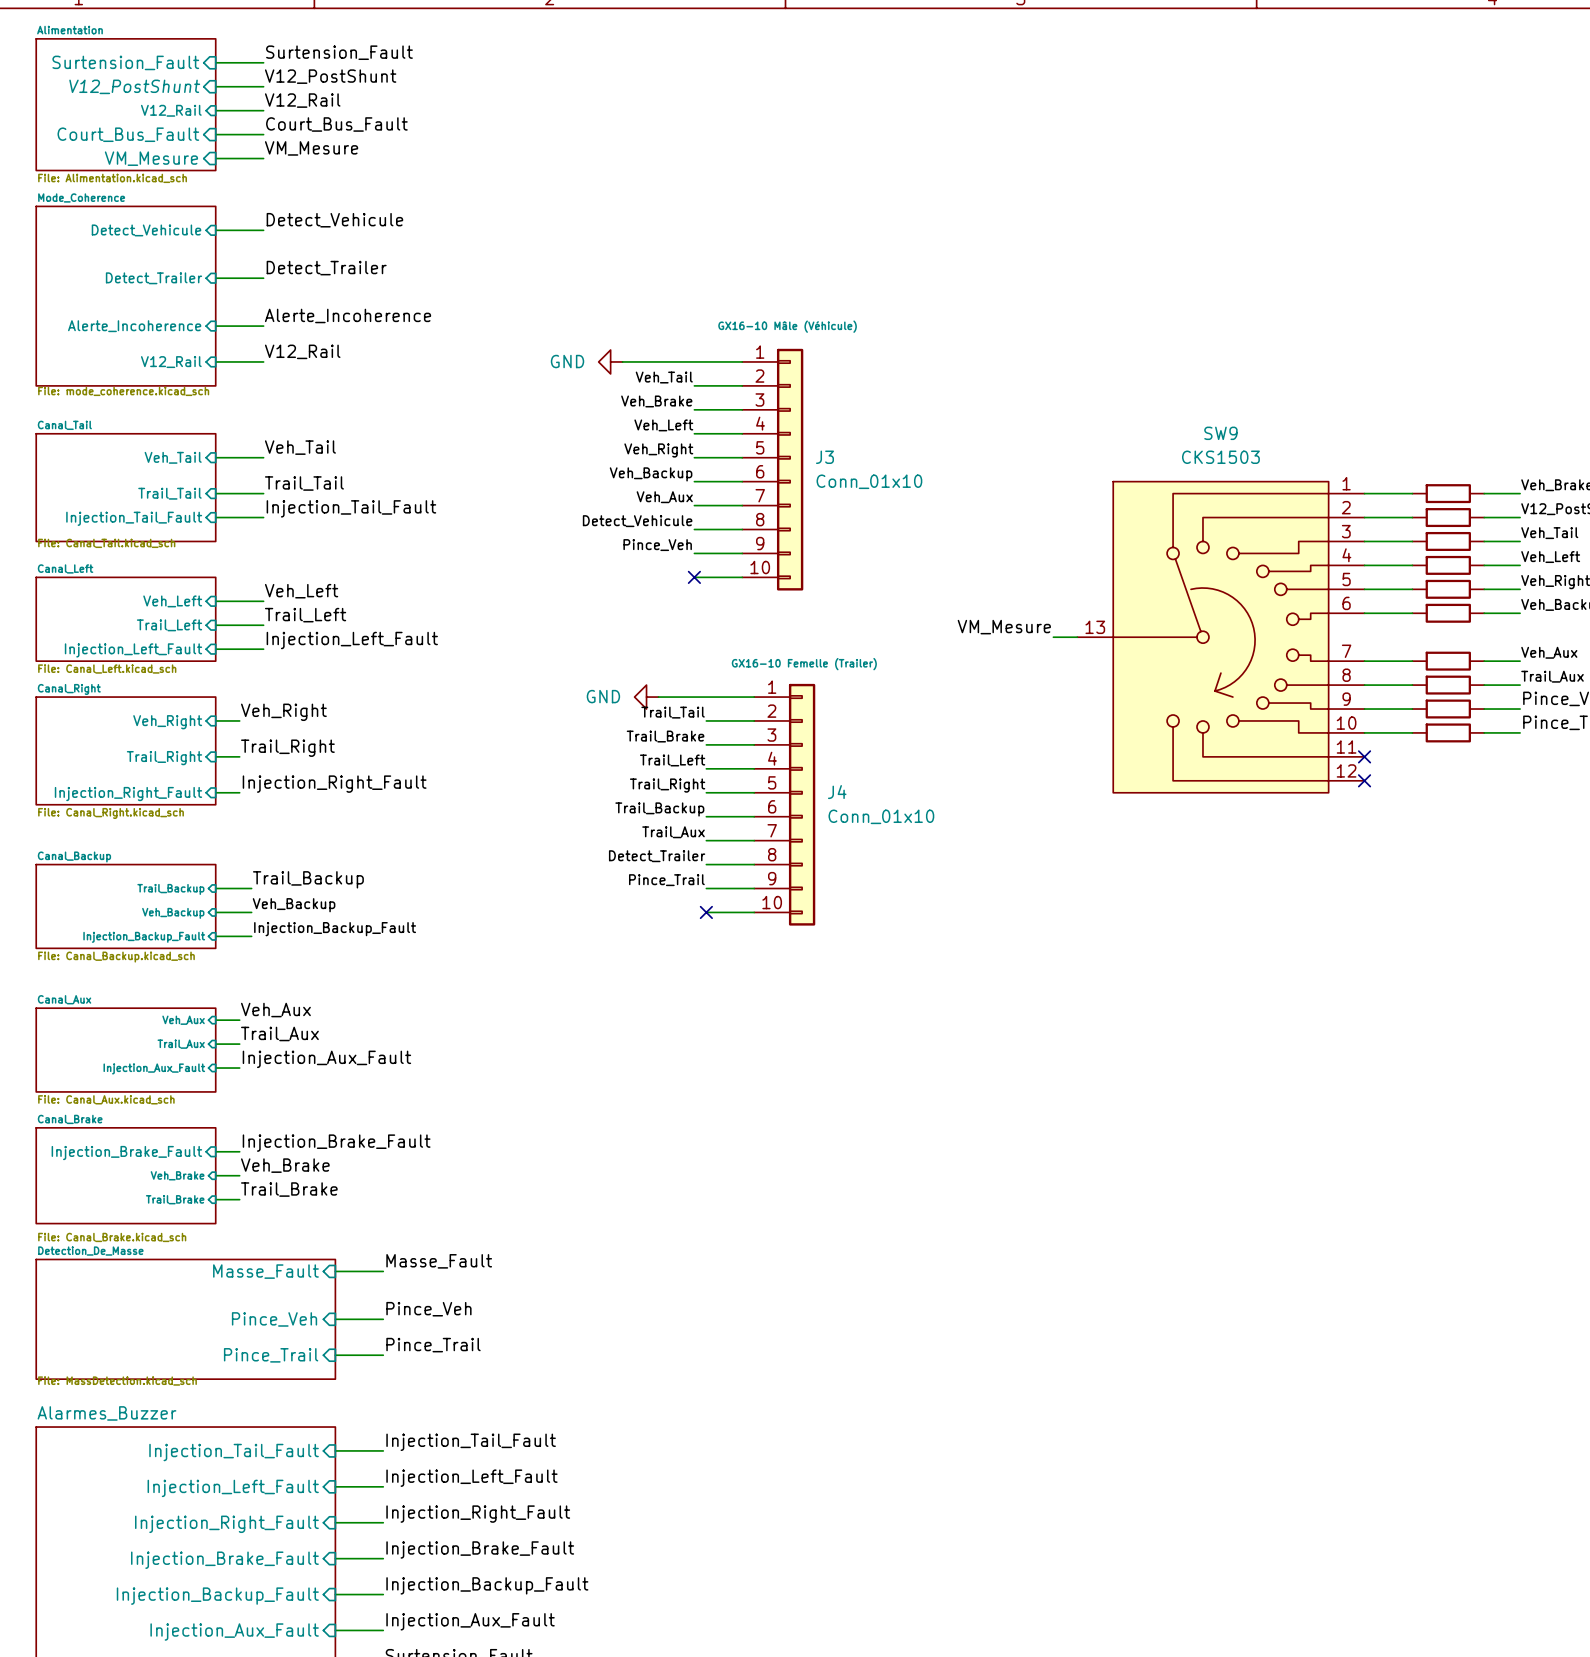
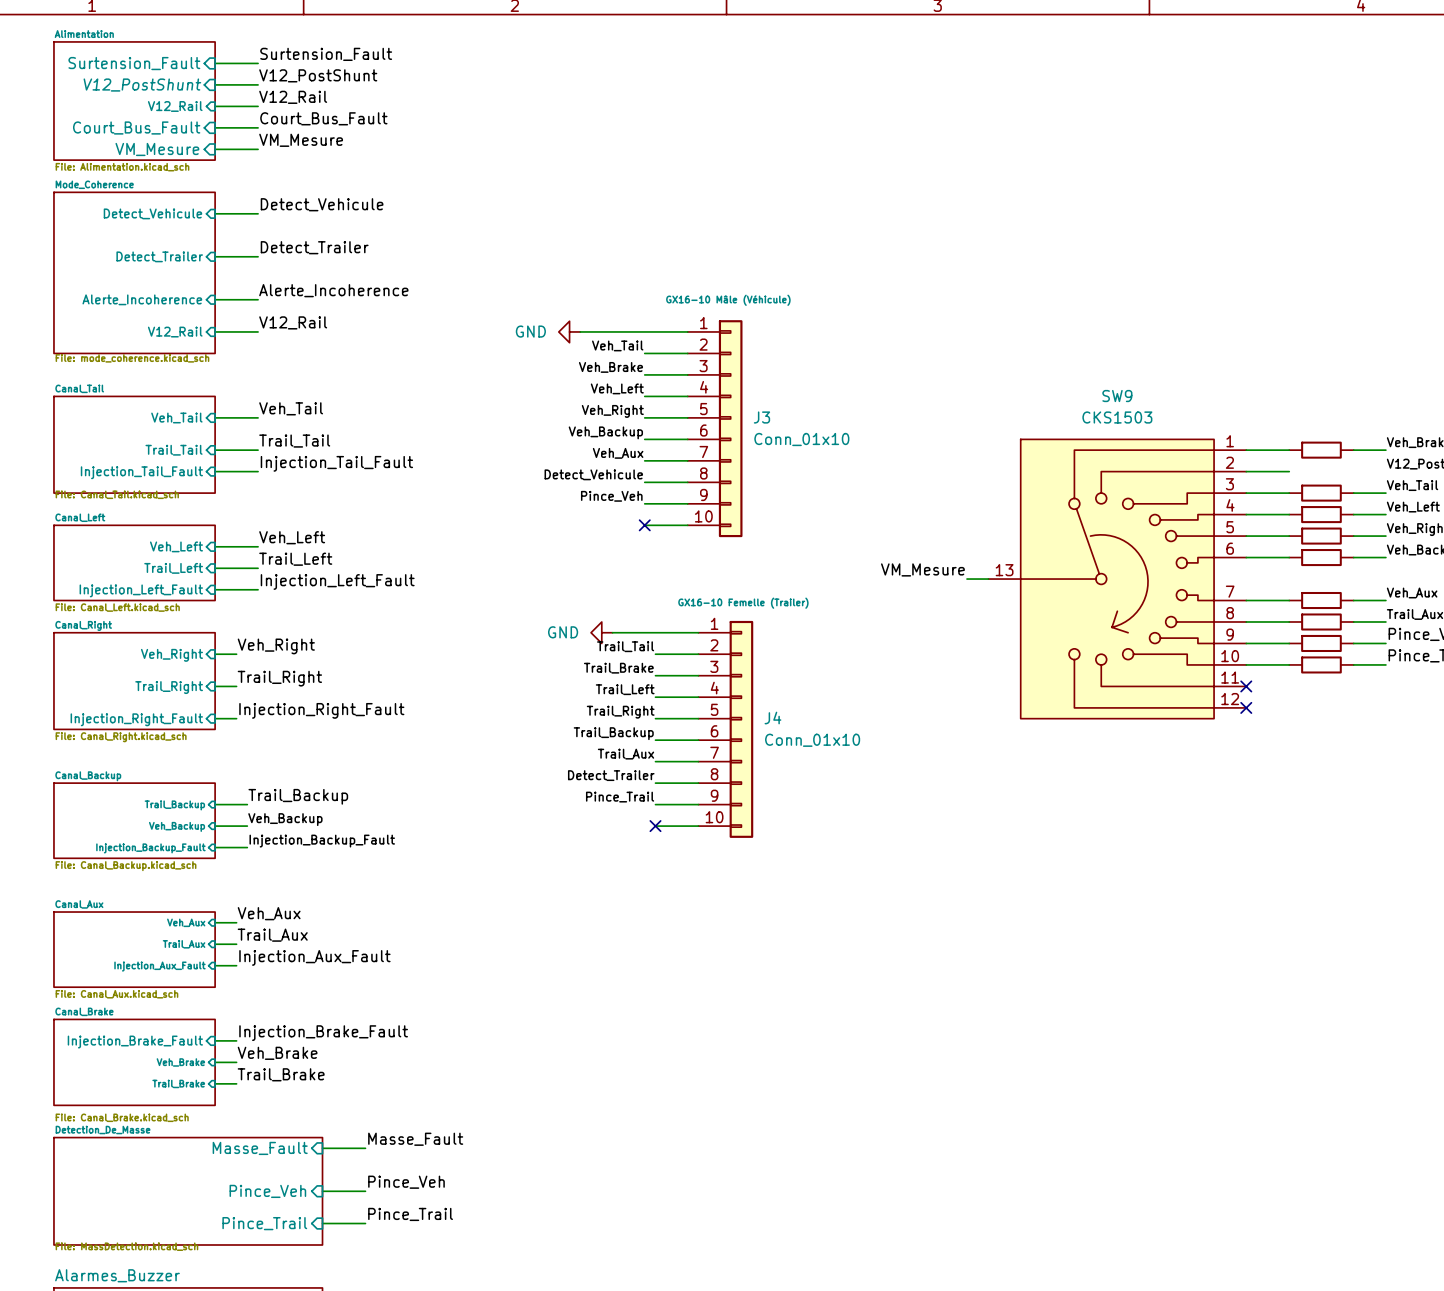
part: (1448, 517) -> none
wire: (1484, 517) (1520, 517) -> none

